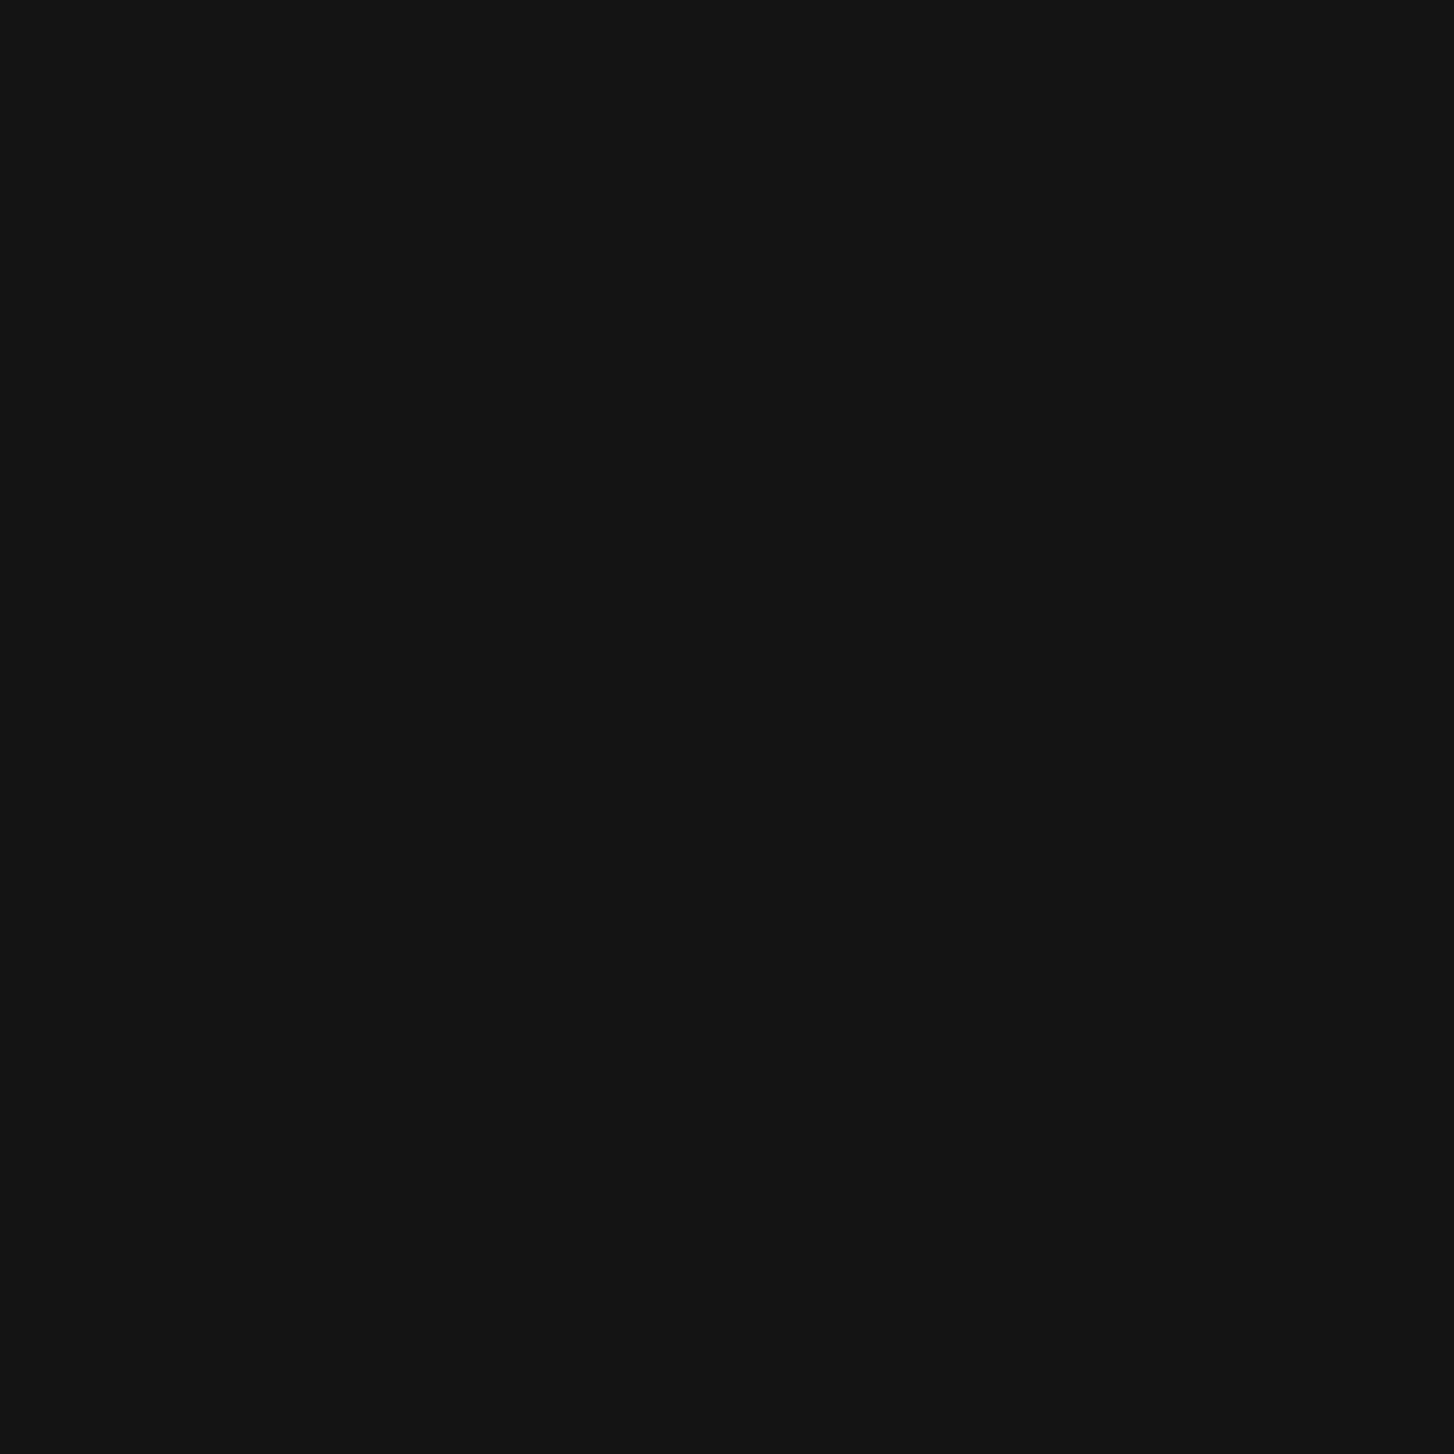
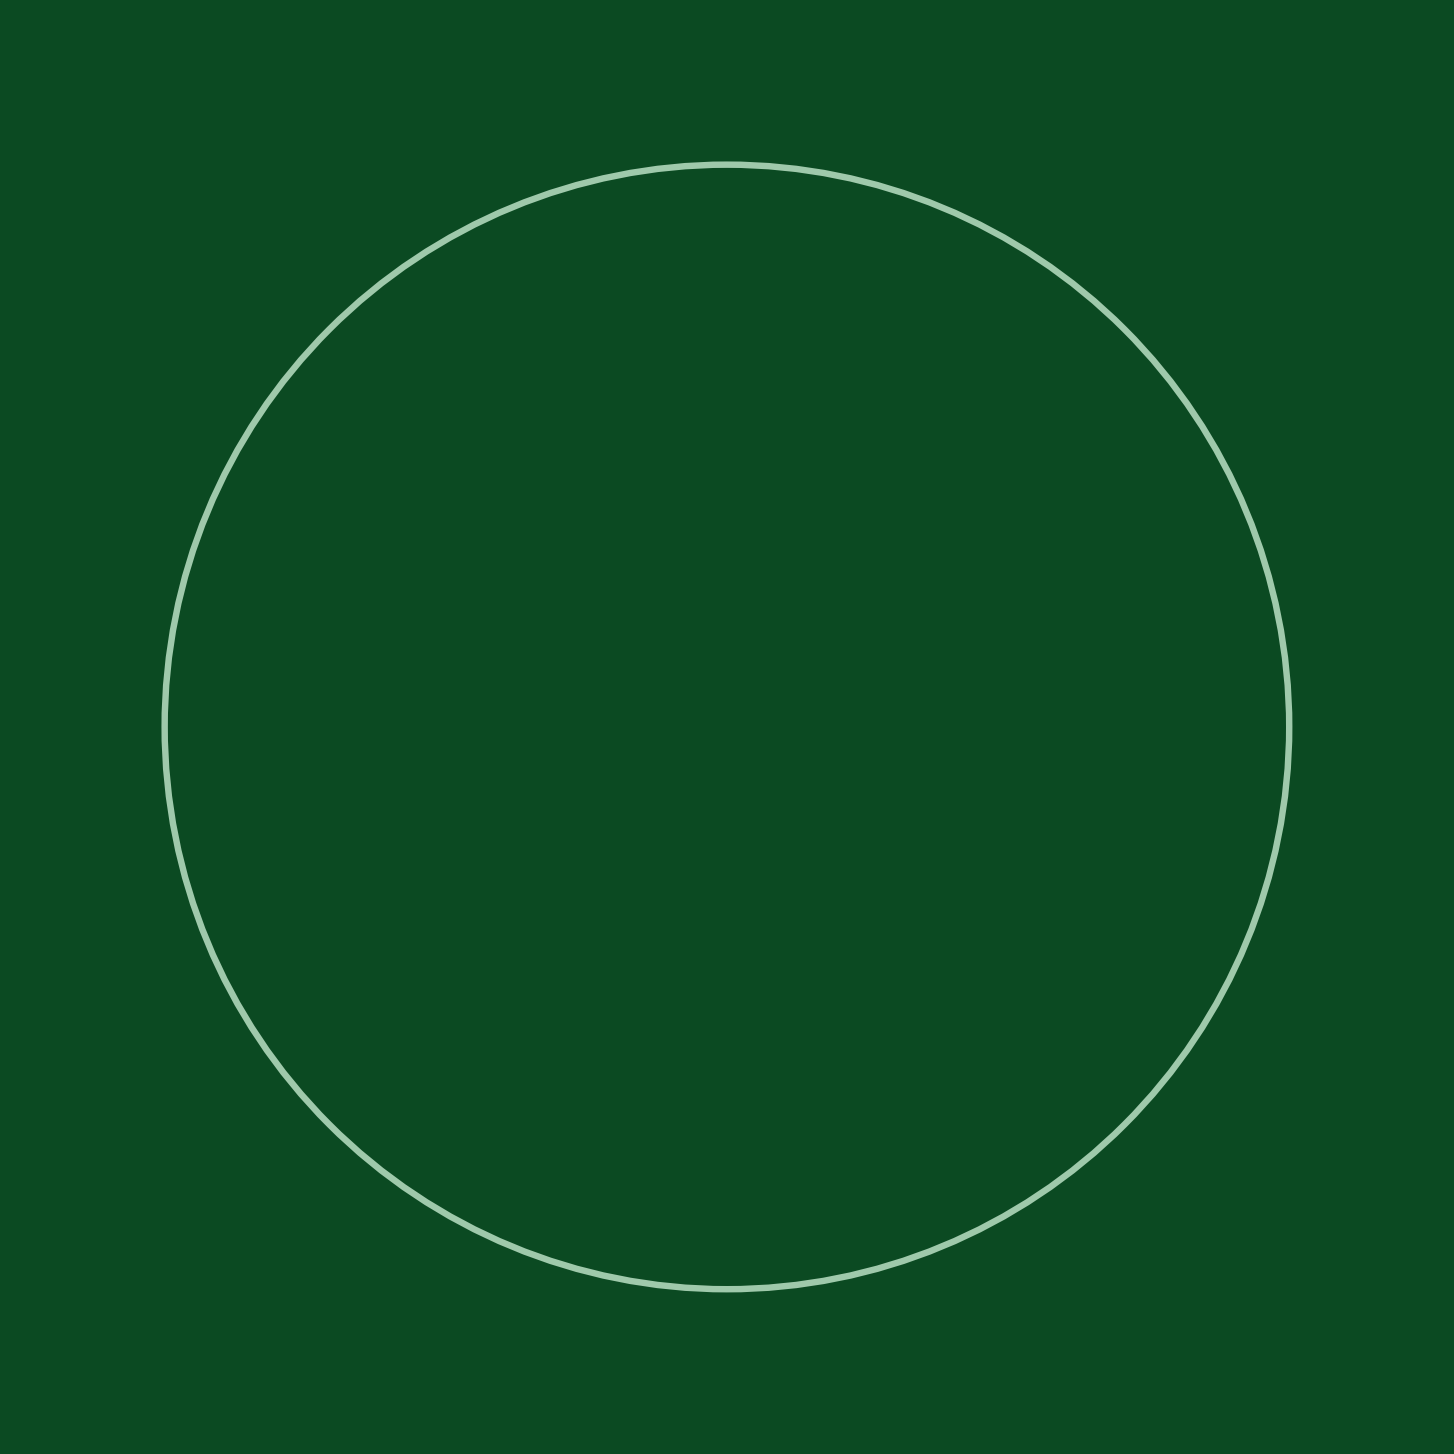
drawing: none -> [161, 161, 1293, 1293]

